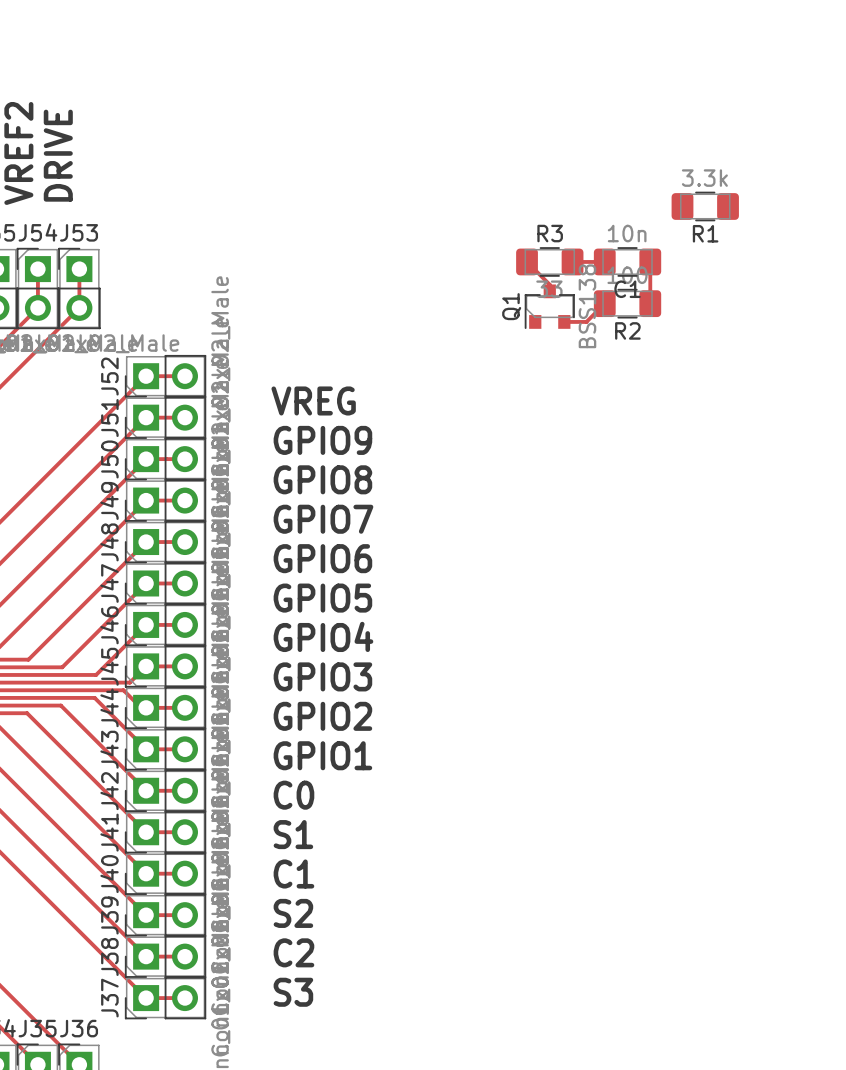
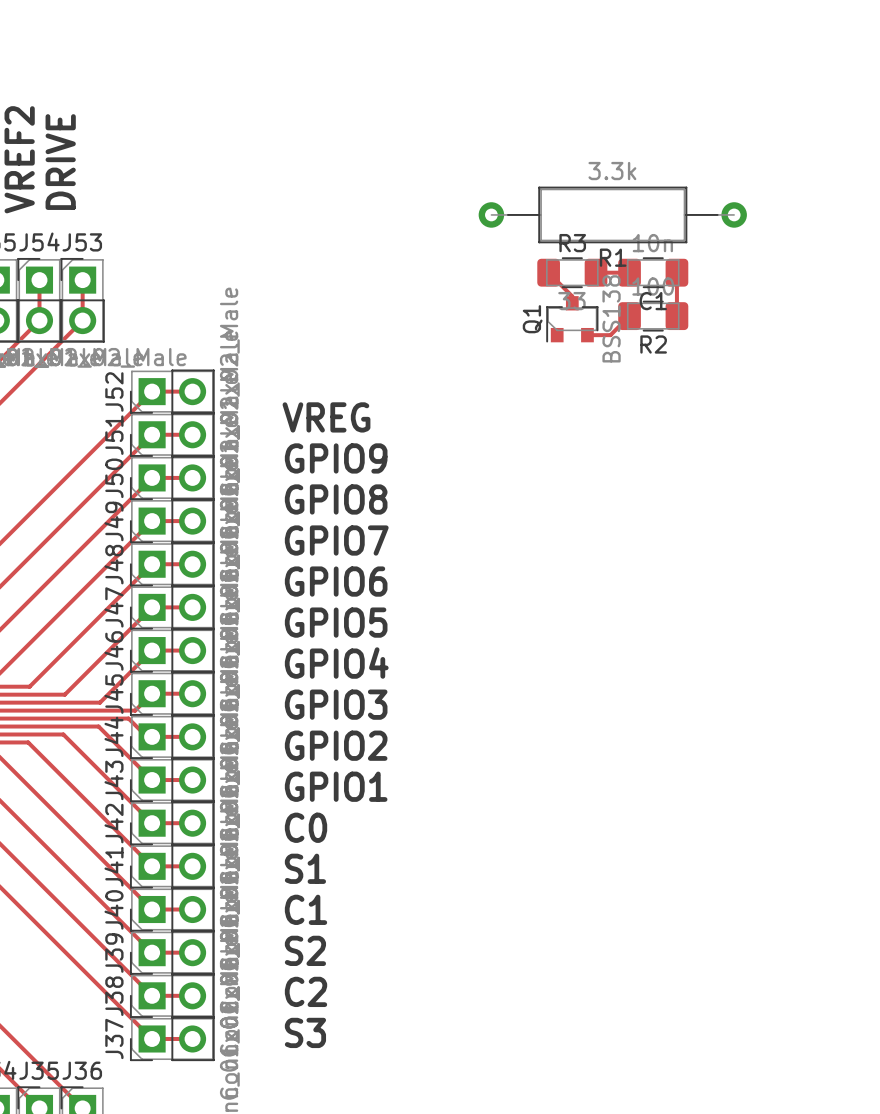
R1 footprint: [671, 191, 739, 222] -> [478, 186, 747, 244]

